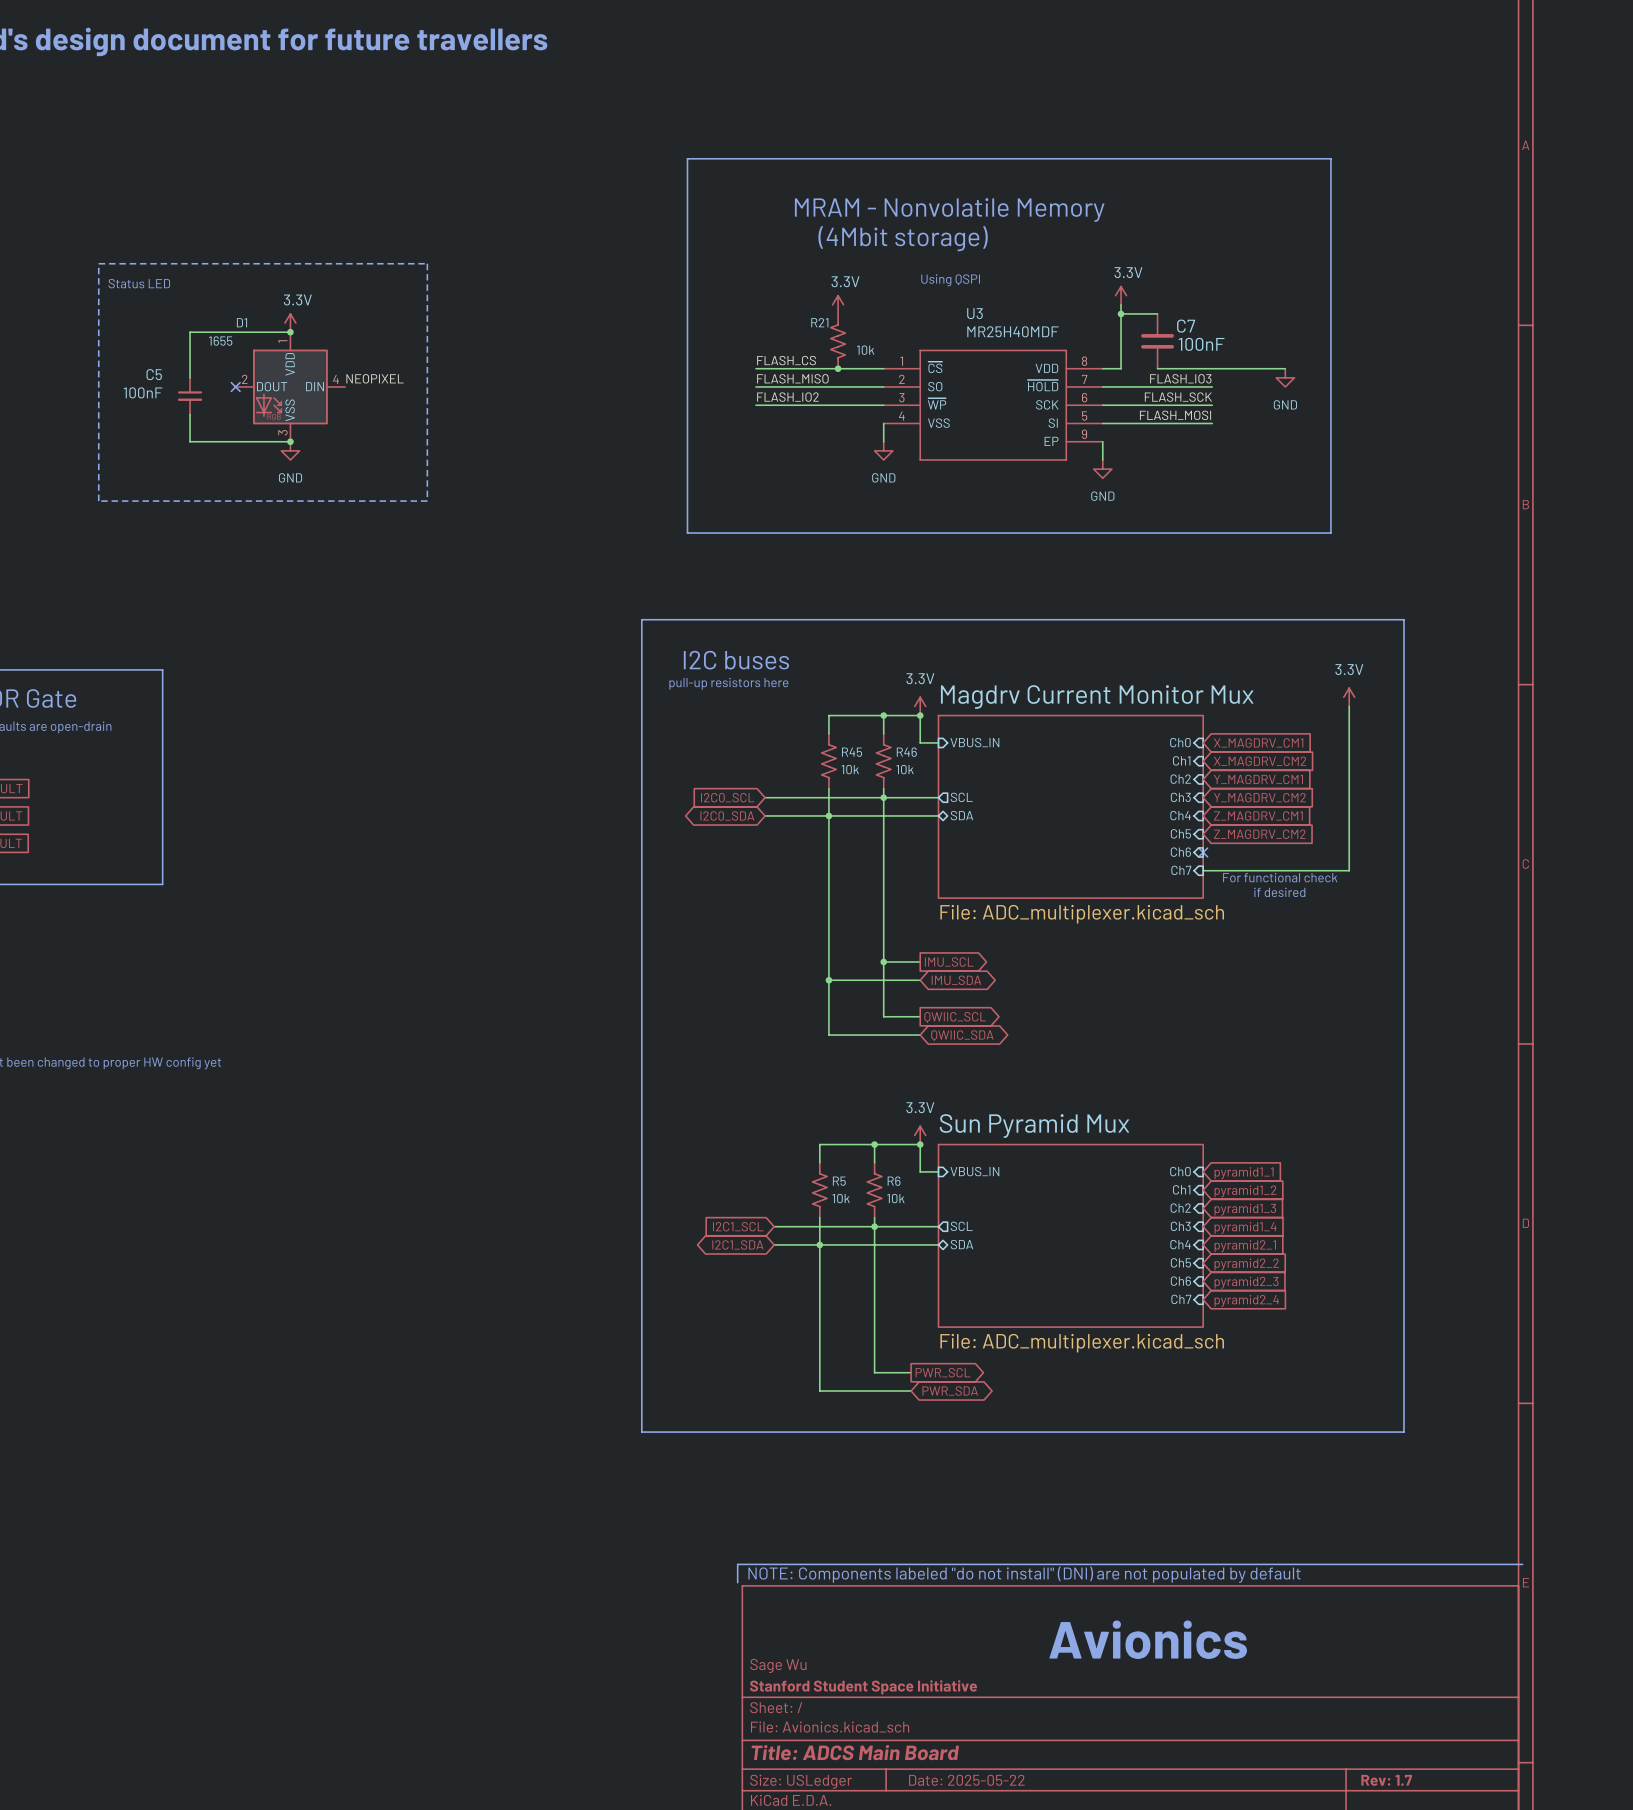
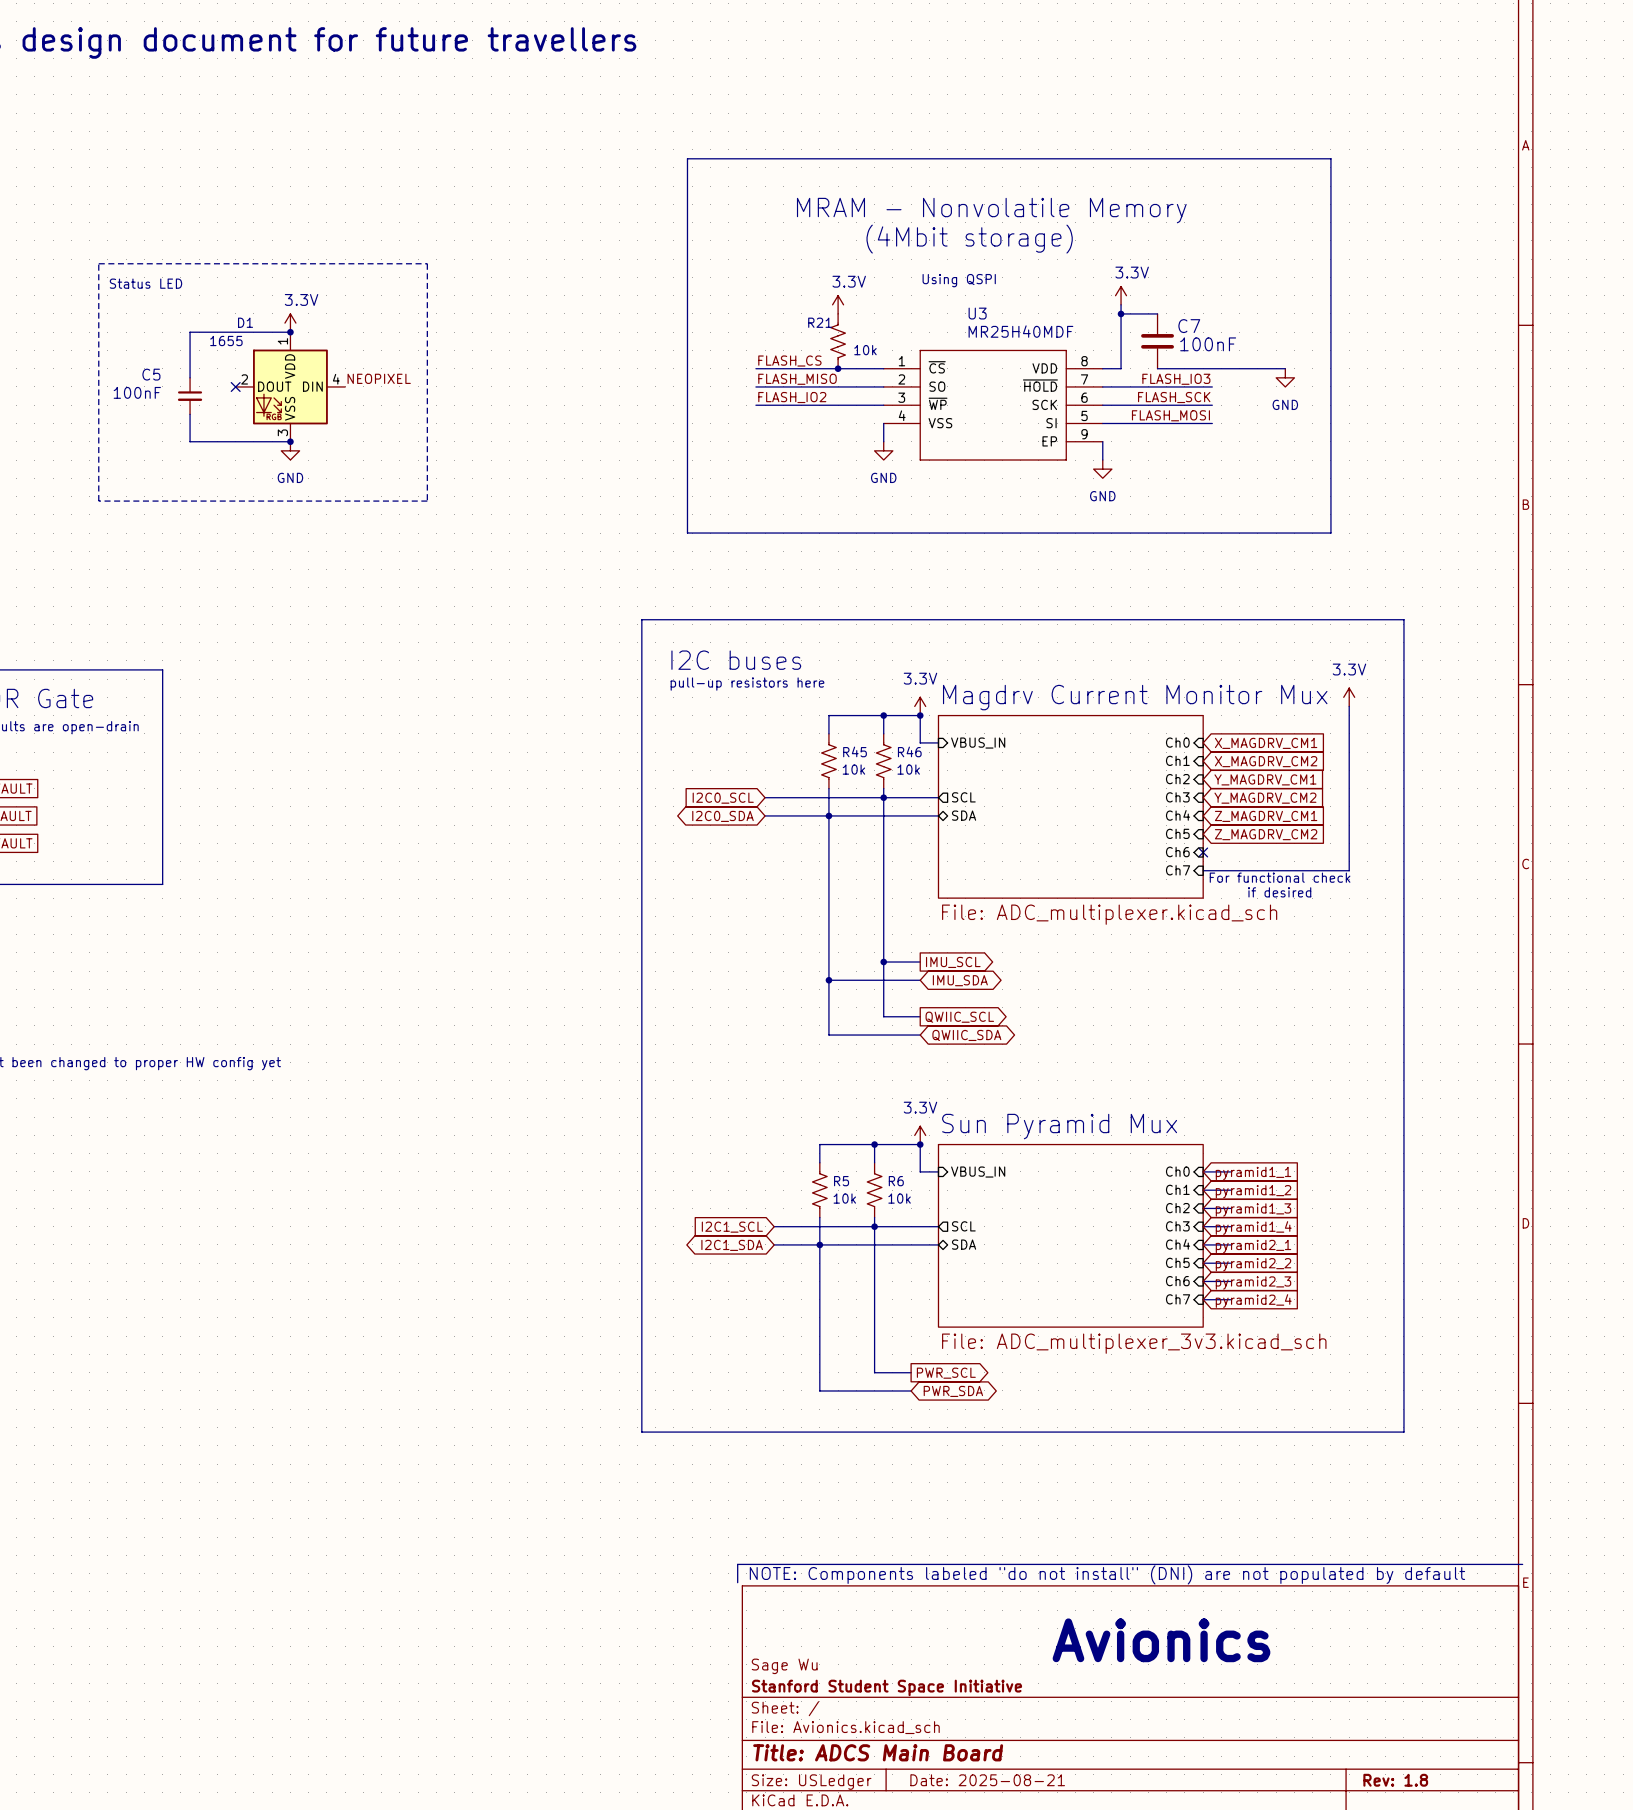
wire: none -> (1203, 1171) (1230, 1171)
wire: none -> (1203, 1190) (1230, 1190)
wire: none -> (1203, 1208) (1230, 1208)
wire: none -> (1203, 1226) (1230, 1226)
wire: none -> (1203, 1244) (1230, 1244)
wire: none -> (1203, 1263) (1230, 1263)
wire: none -> (1203, 1281) (1230, 1281)
wire: none -> (1203, 1299) (1230, 1299)
sheet Sun Pyramid Mux value: File: ADC_multiplexer.kicad_sch (1082, 1343) -> File: ADC_multiplexer_3v3.kicad_sch (1134, 1343)
title block: Date: 2025-05-22 (966, 1780) -> Date: 2025-08-21 (987, 1780)
title block: Rev: 1.7 (1386, 1780) -> Rev: 1.8 (1395, 1780)

